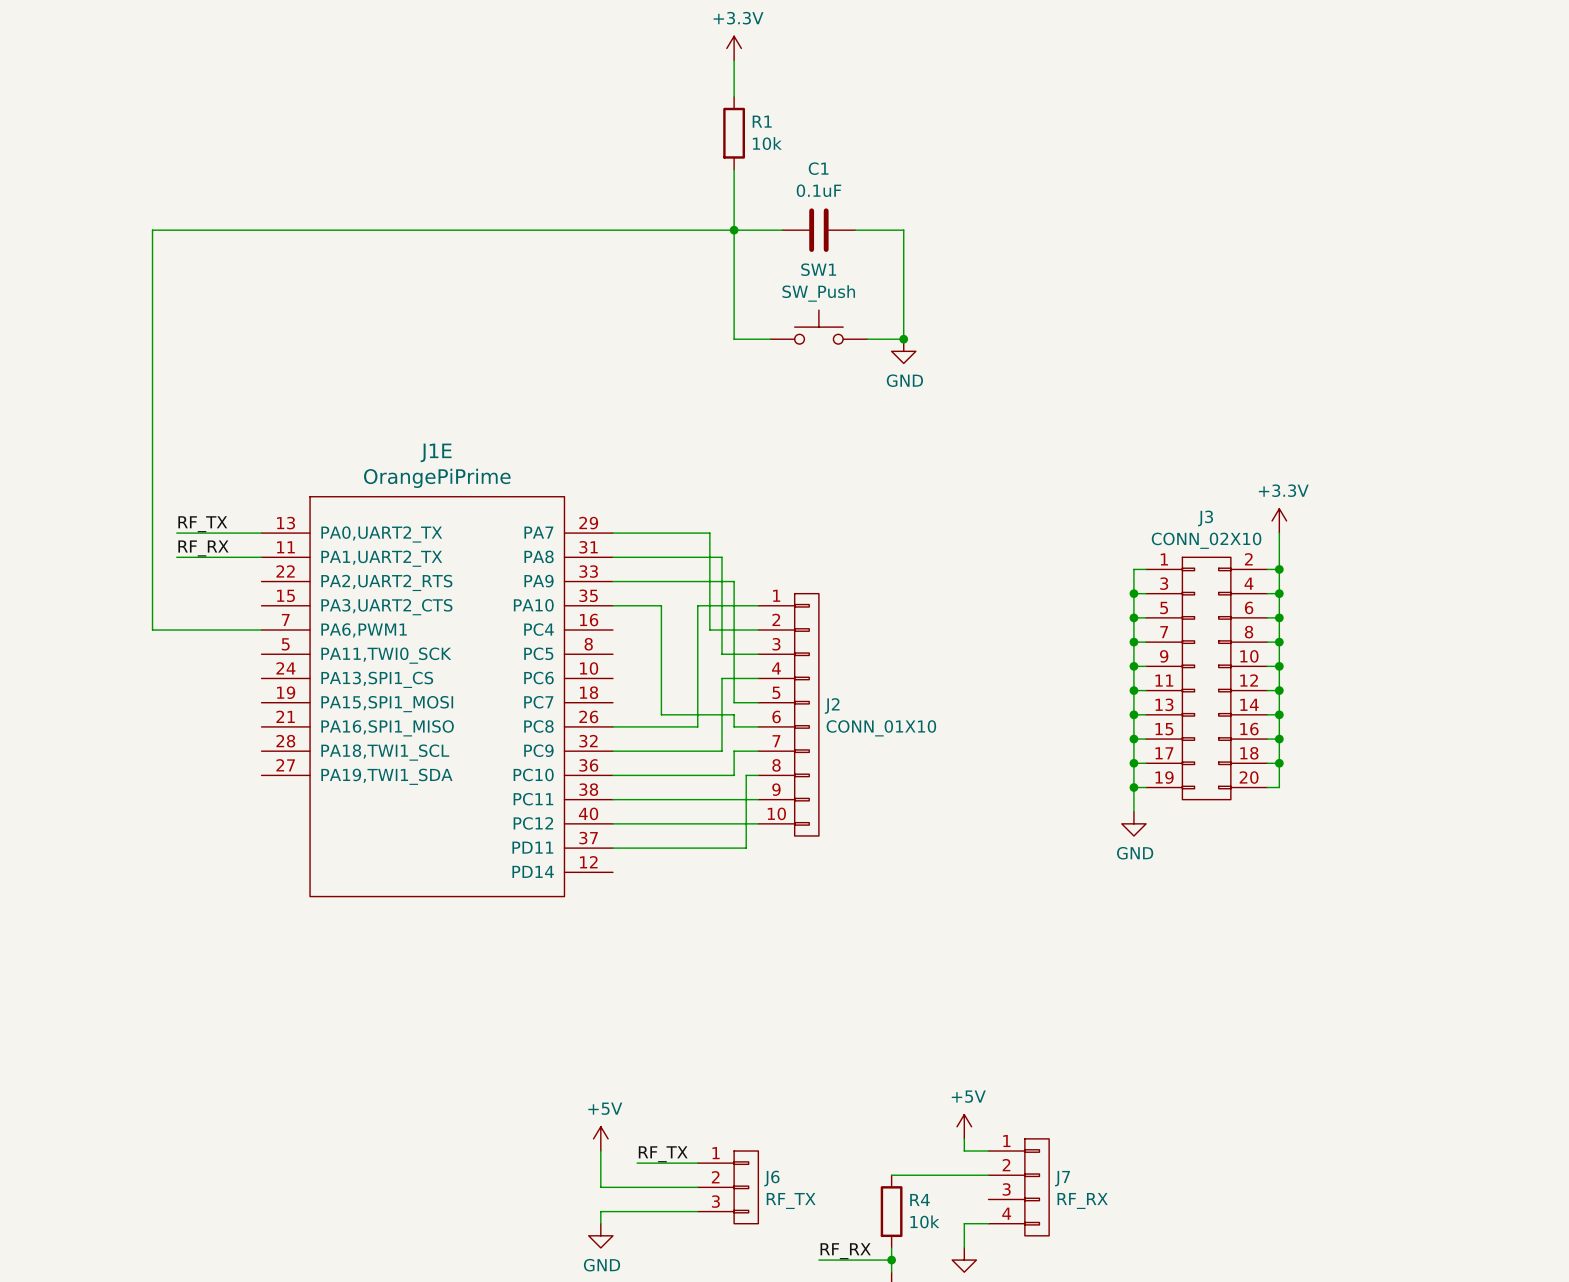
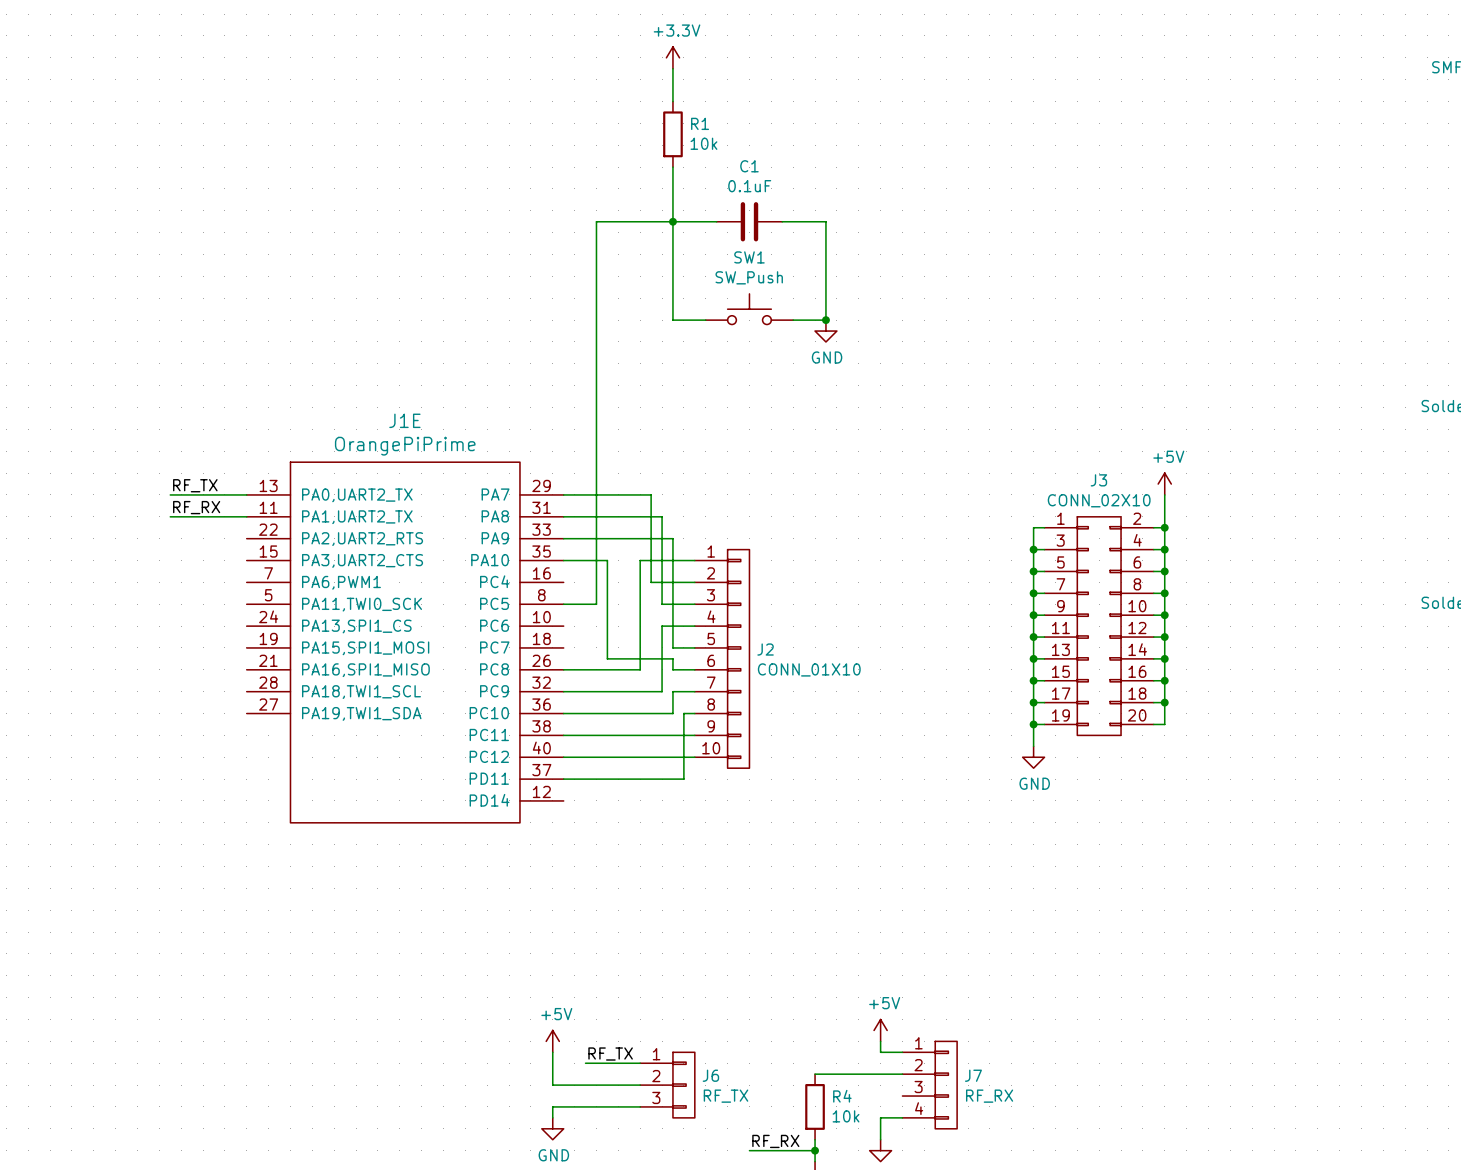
wire: (649, 230) (152, 230) (152, 630) (261, 630) -> (596, 221) (596, 604) (563, 604)
power symbol: +3.3V (1279, 520) -> +5V (1164, 484)

